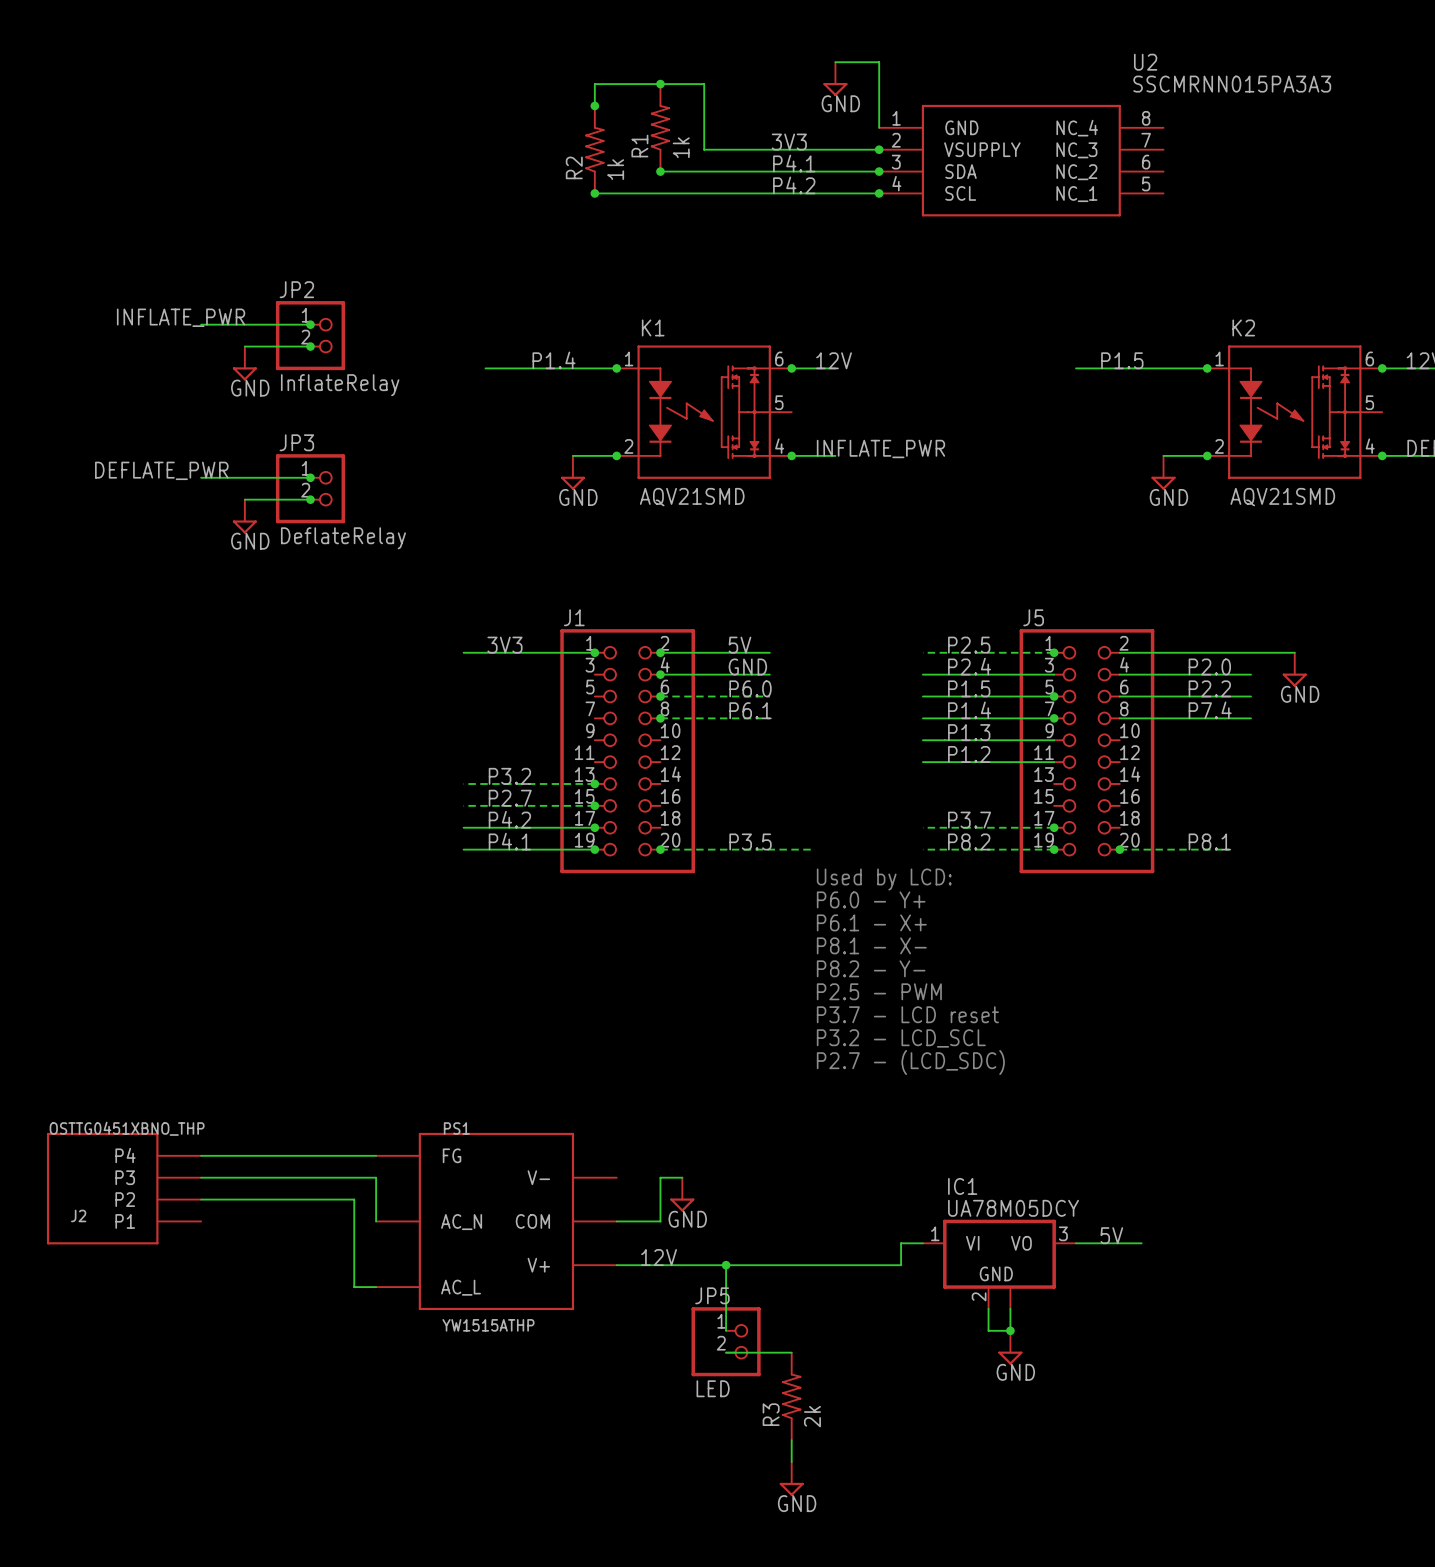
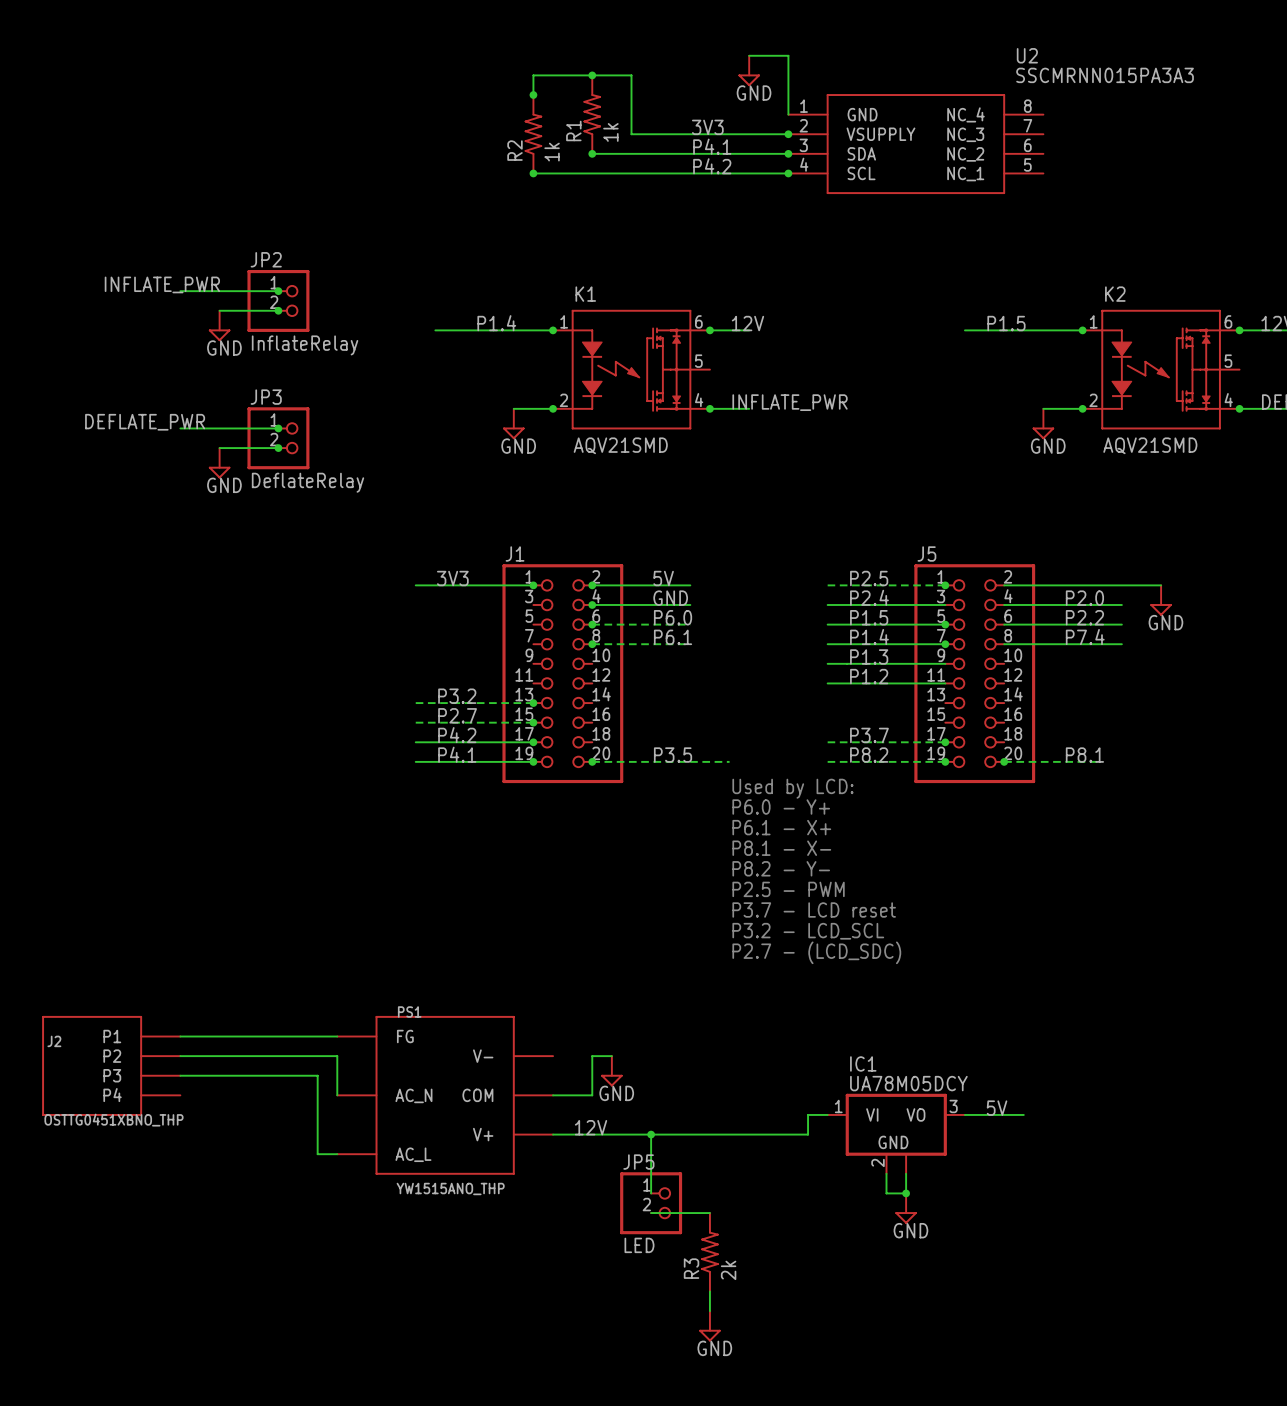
J2 flip: as is (102, 1188) -> up-down (92, 1065)
J2 name position: J2 (78, 1215) -> J2 (54, 1041)
PS1 value: YW1515ATHP (488, 1325) -> YW1515ANO_THP (450, 1188)

